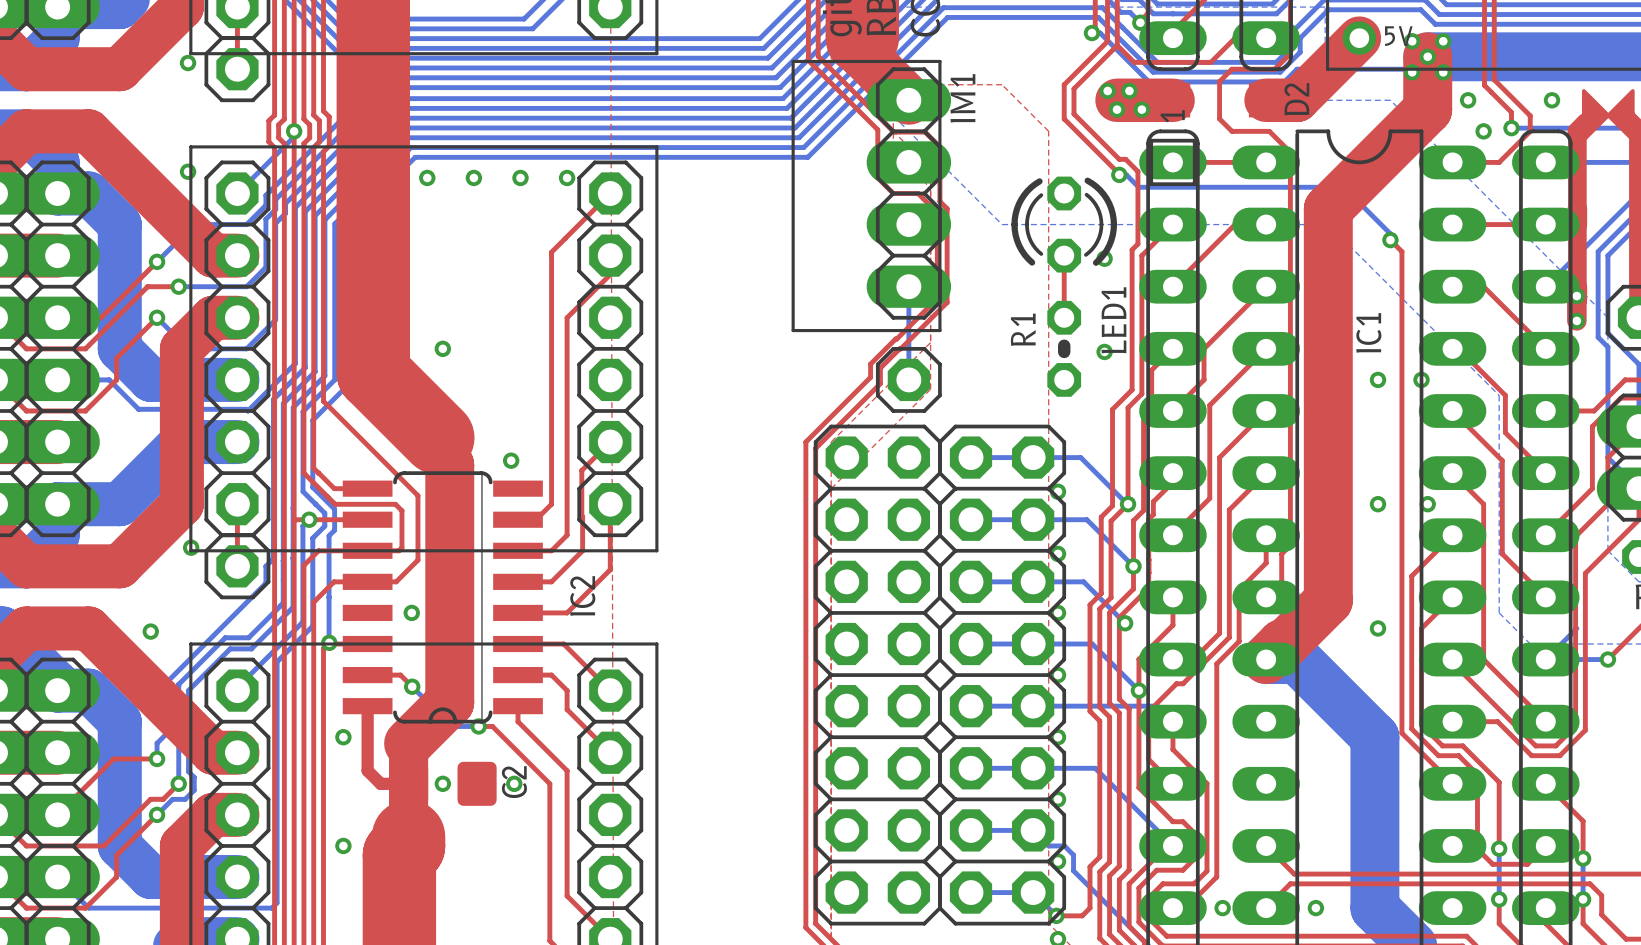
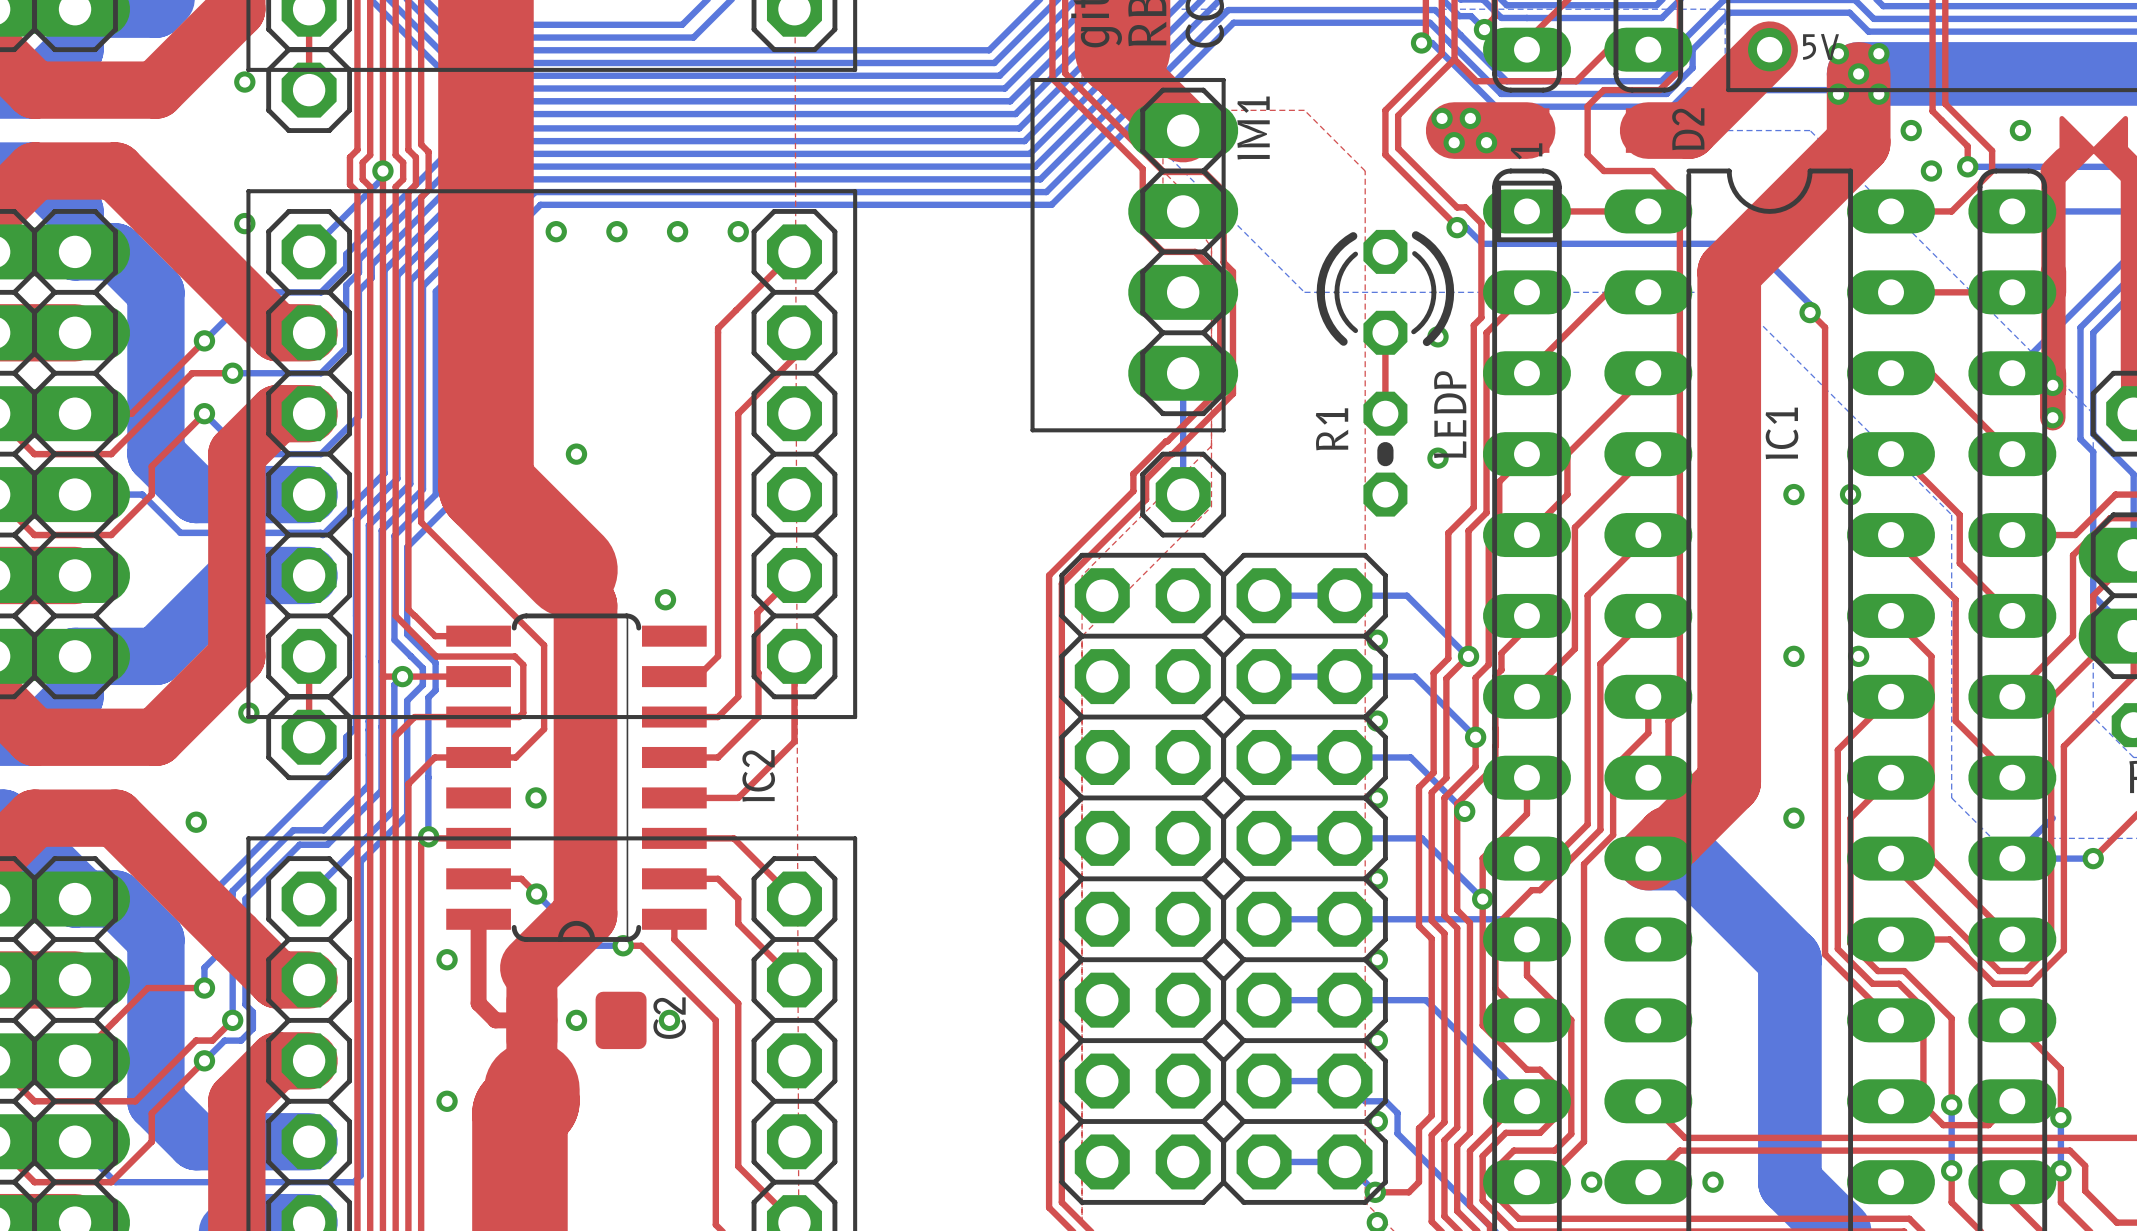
LED1 name: LED1 (1113, 320) -> LEDP (1450, 414)

